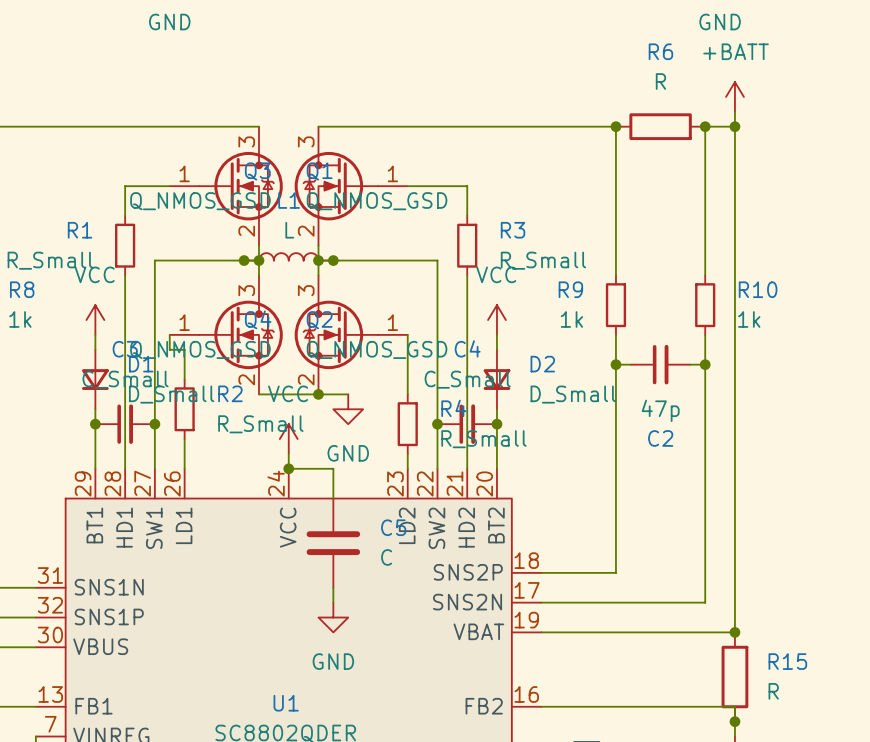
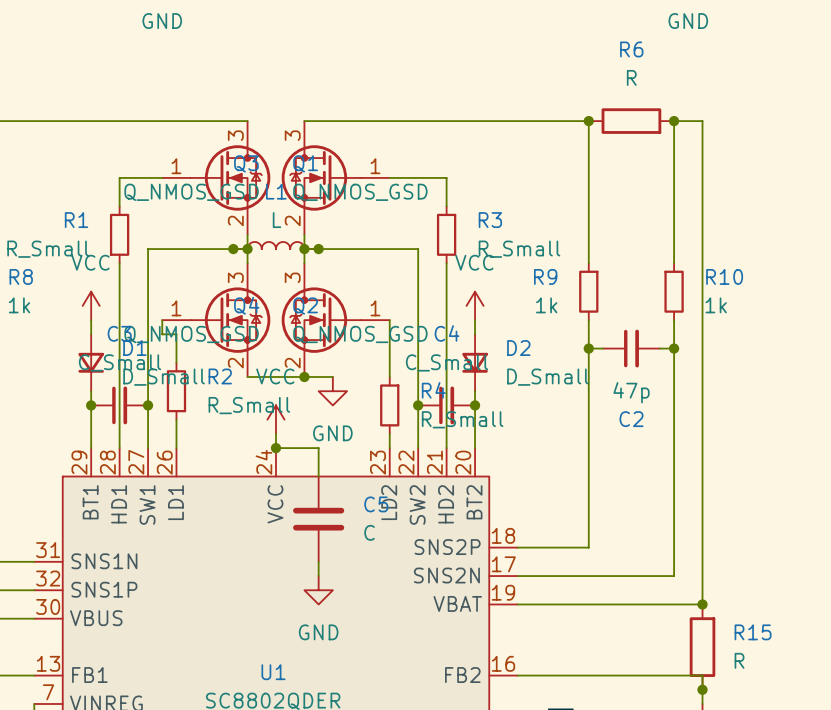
power symbol: +BATT (734, 96) -> none
wire: (734, 111) (734, 126) -> none
junction: (734, 126) -> none

